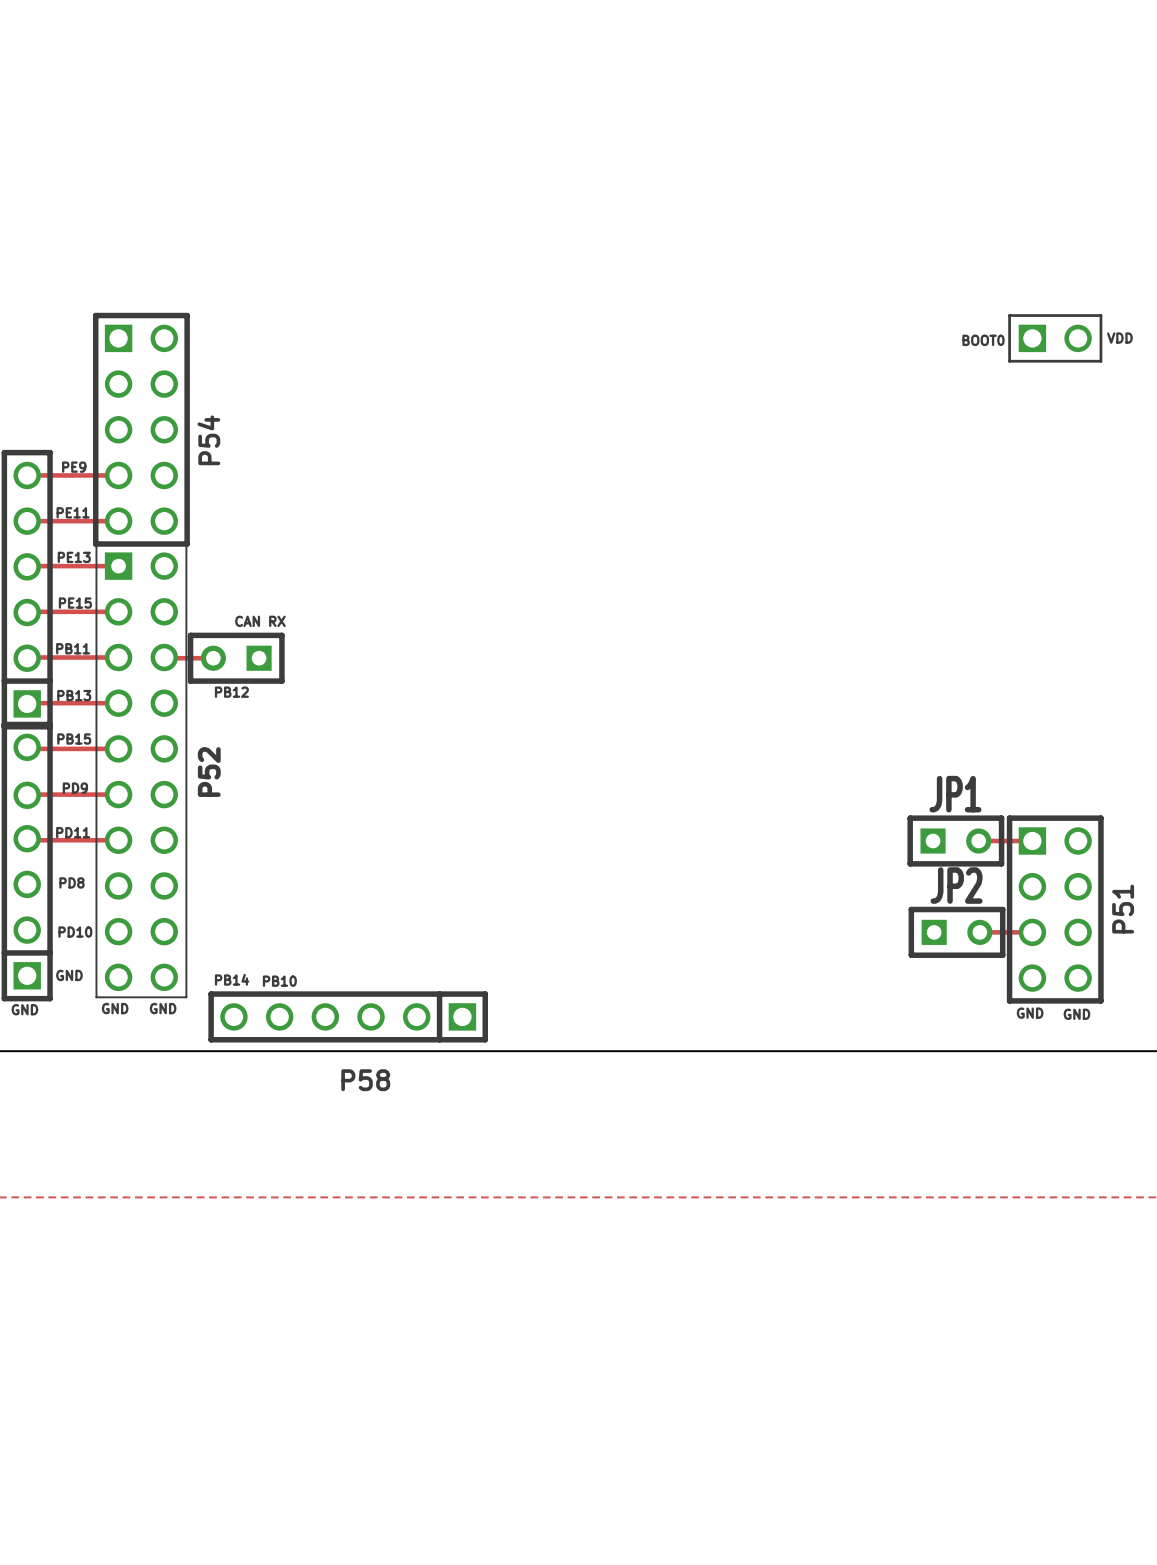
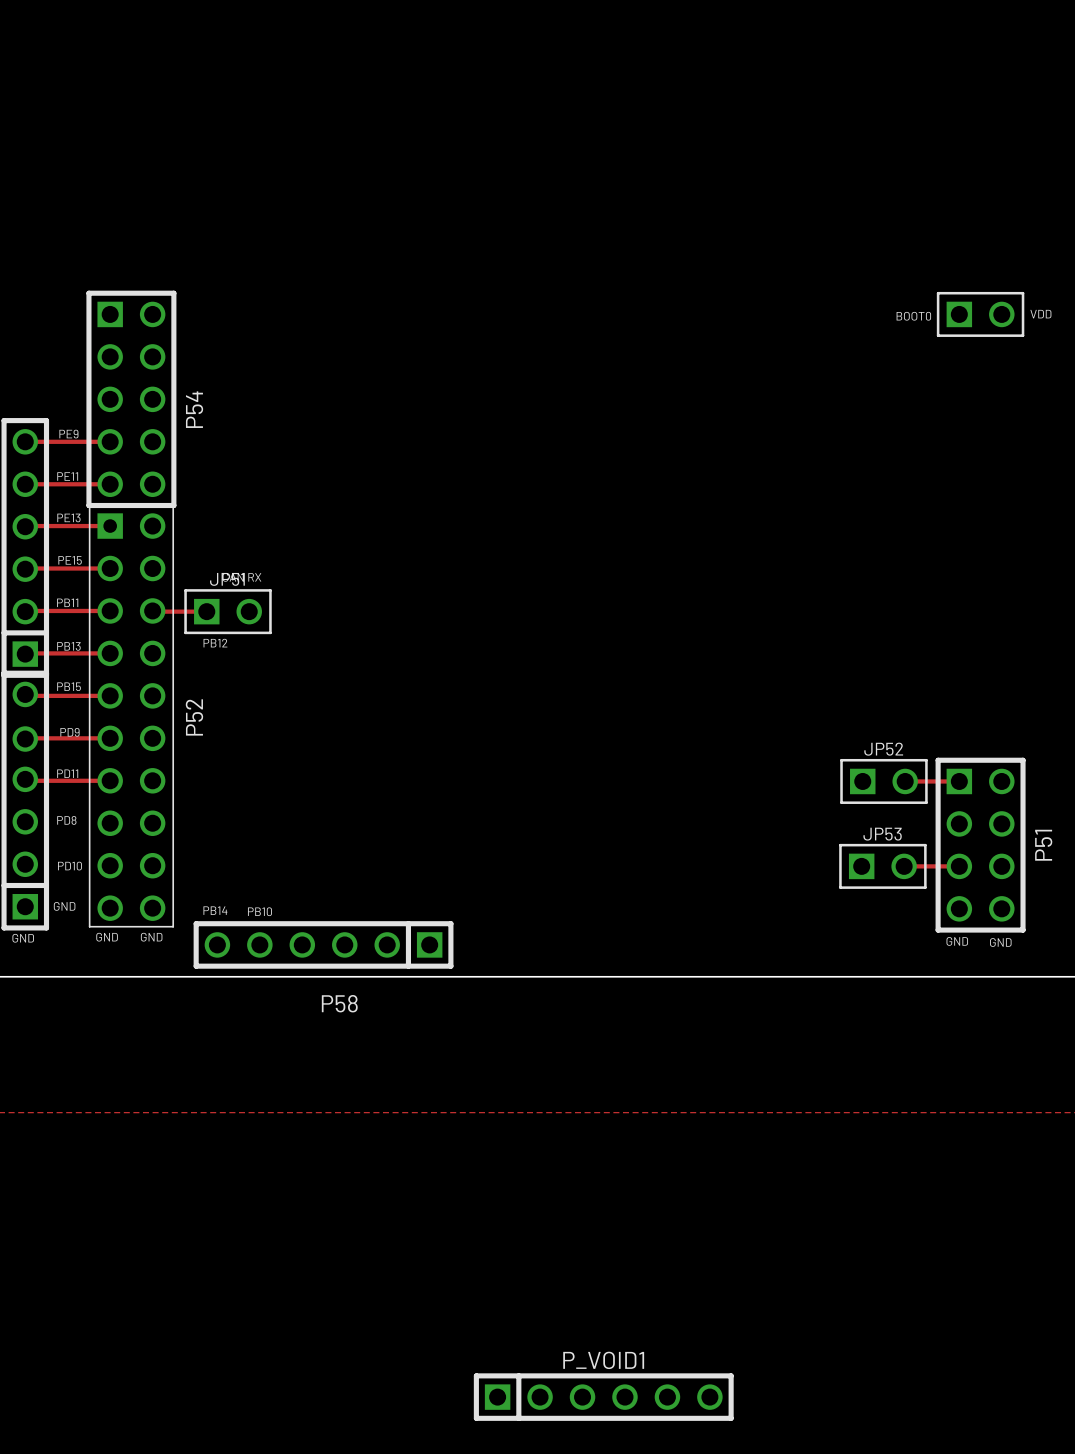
part: (236, 658) -> none
JP51: none -> (228, 611)
JP52: none -> (883, 781)
JP1: (955, 841) -> none
JP53: none -> (882, 866)
JP2: (957, 932) -> none
P_VOID1: none -> (603, 1397)

